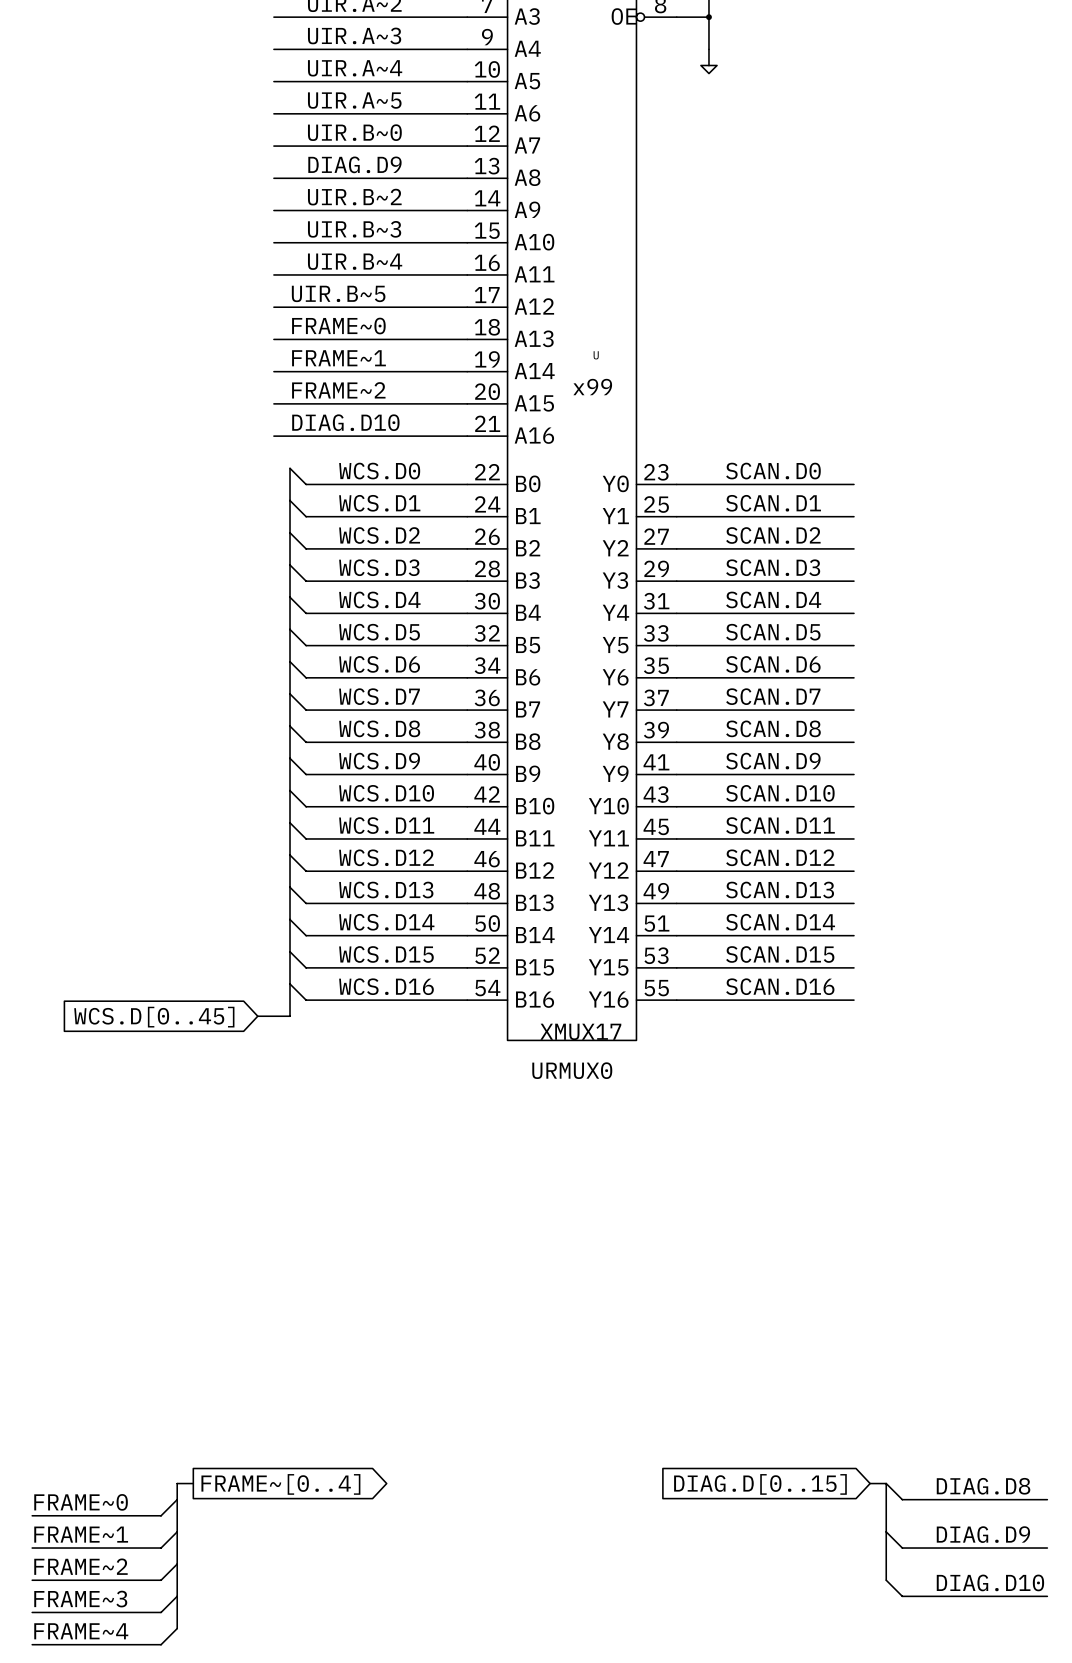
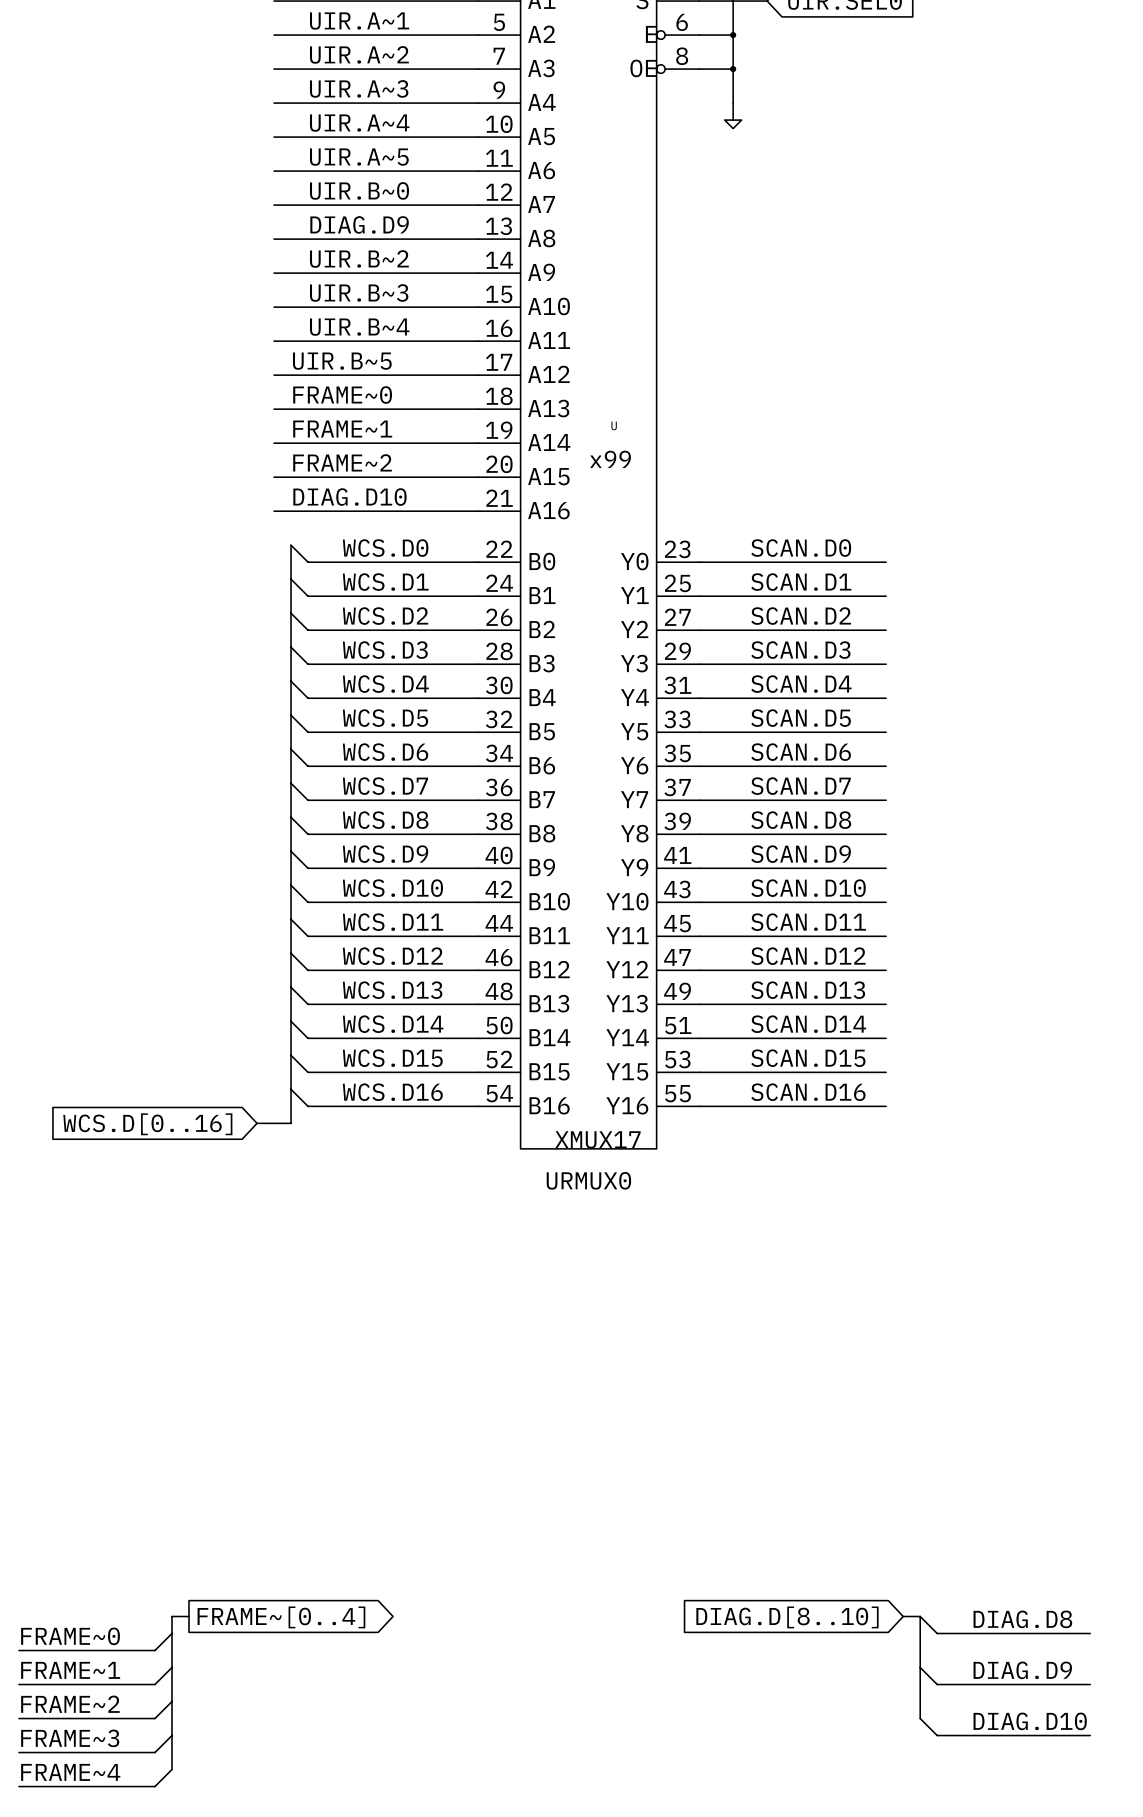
global label: WCS.D[0..45] (154, 1017) -> WCS.D[0..16] (147, 1124)
global label: DIAG.D[0..15] (760, 1484) -> DIAG.D[8..10] (787, 1617)

